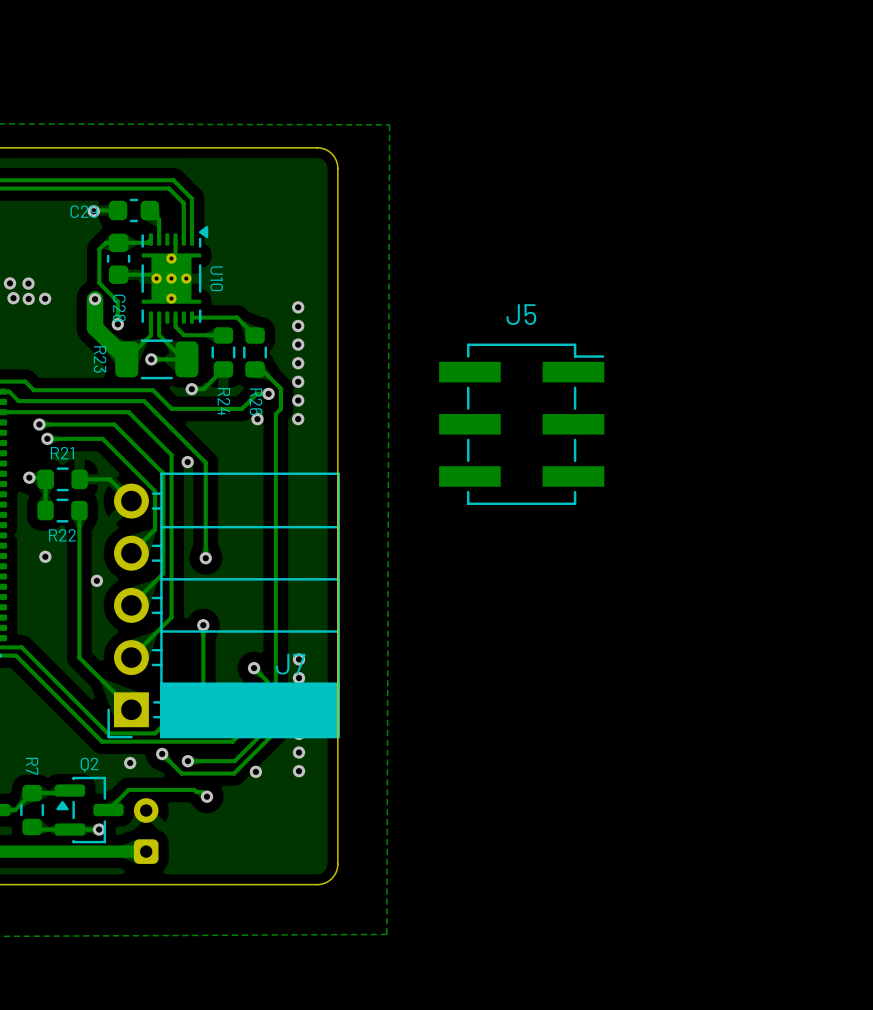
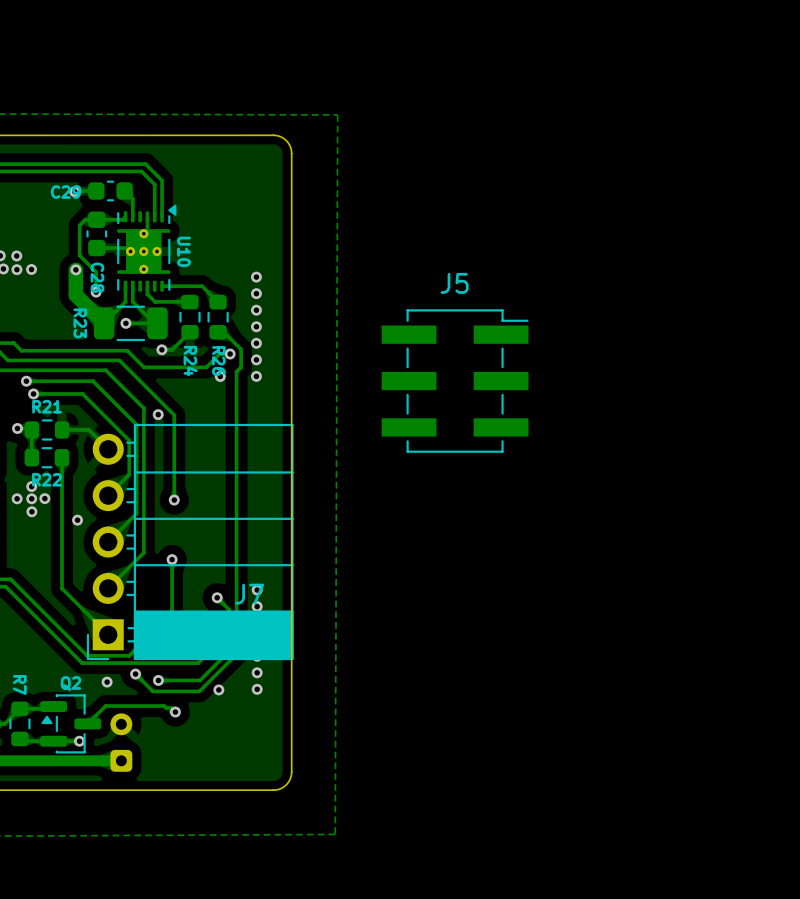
via: none -> (31, 486)
via: none -> (17, 498)
via: none -> (44, 498)
via: none -> (31, 511)

